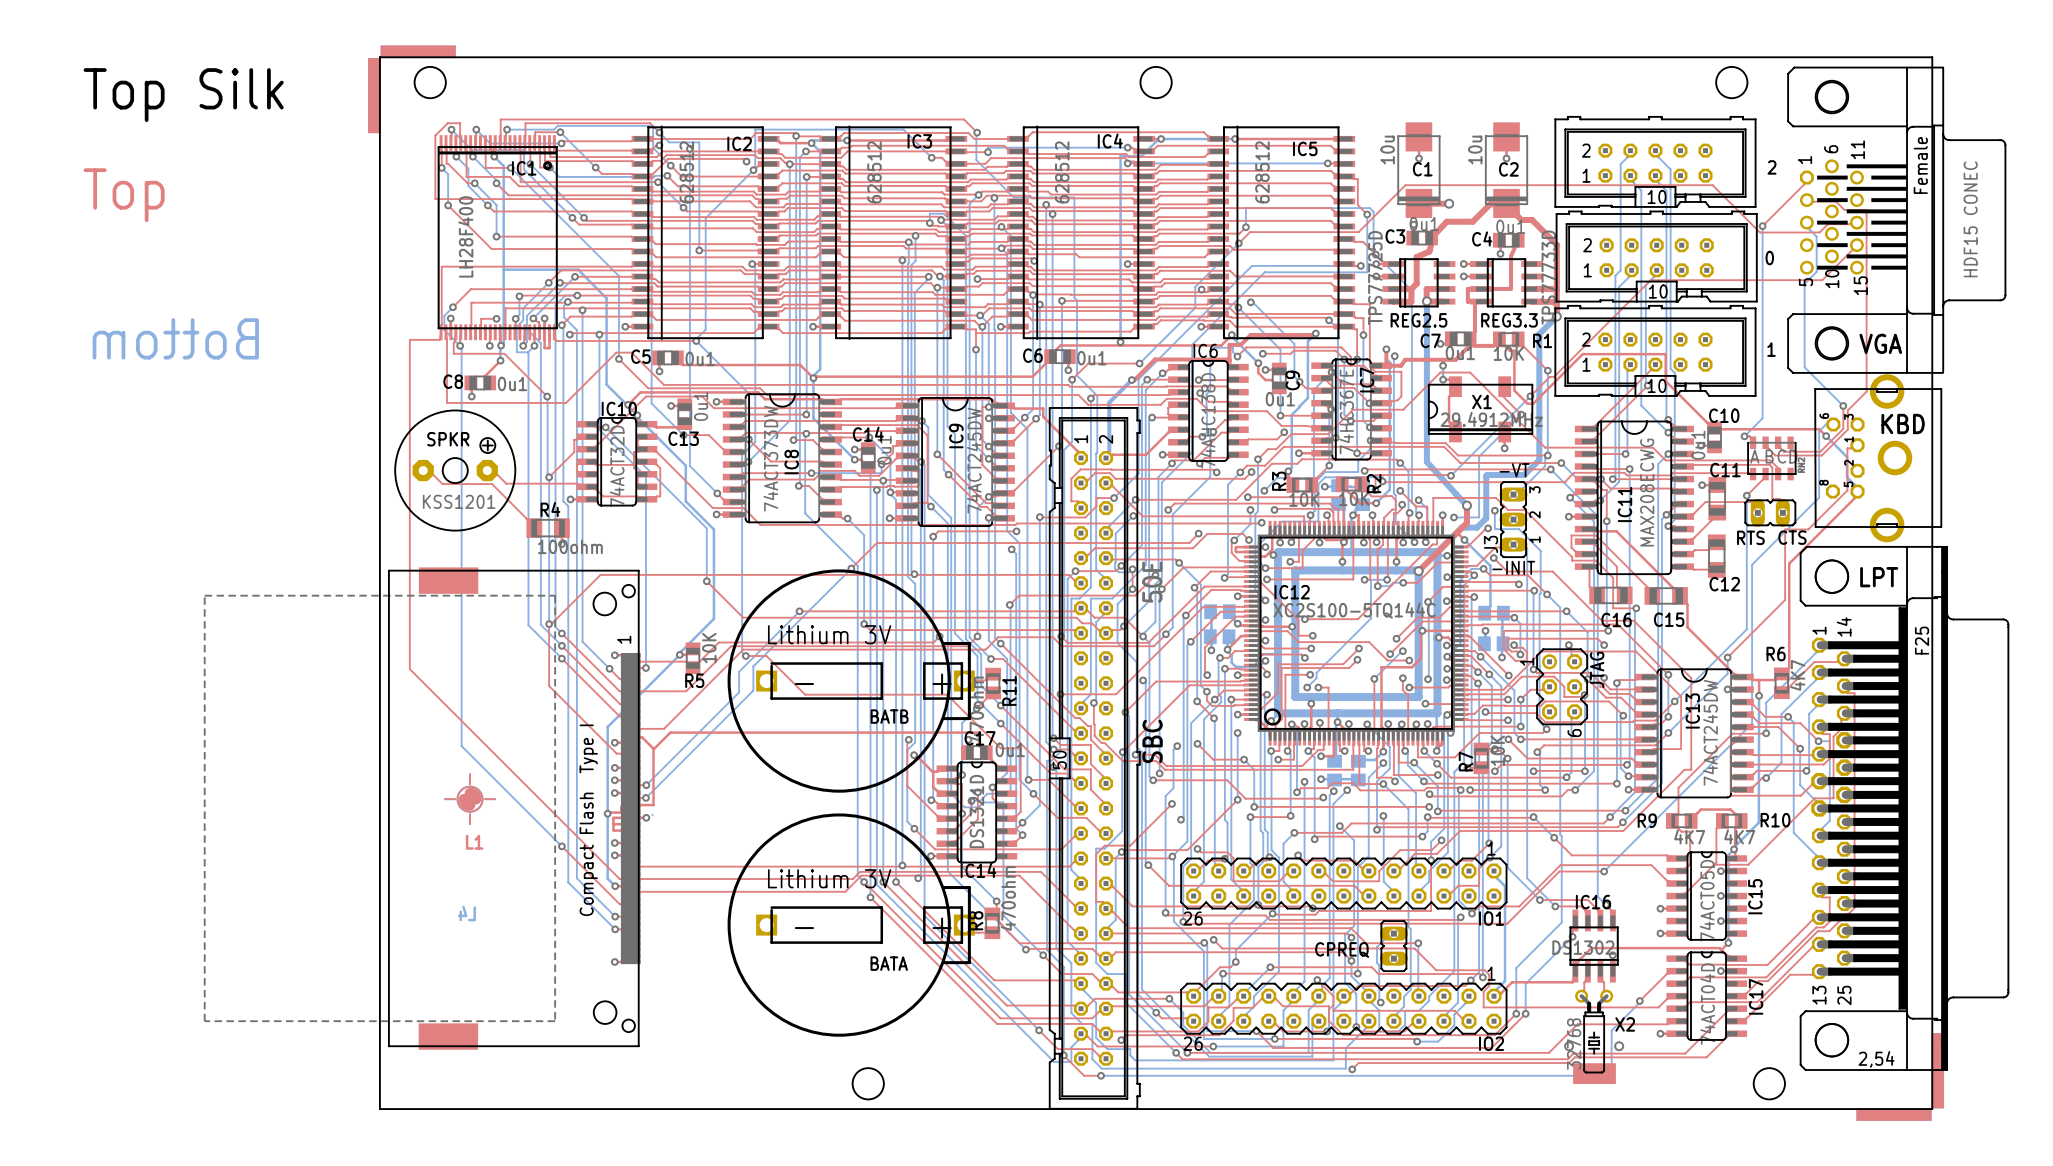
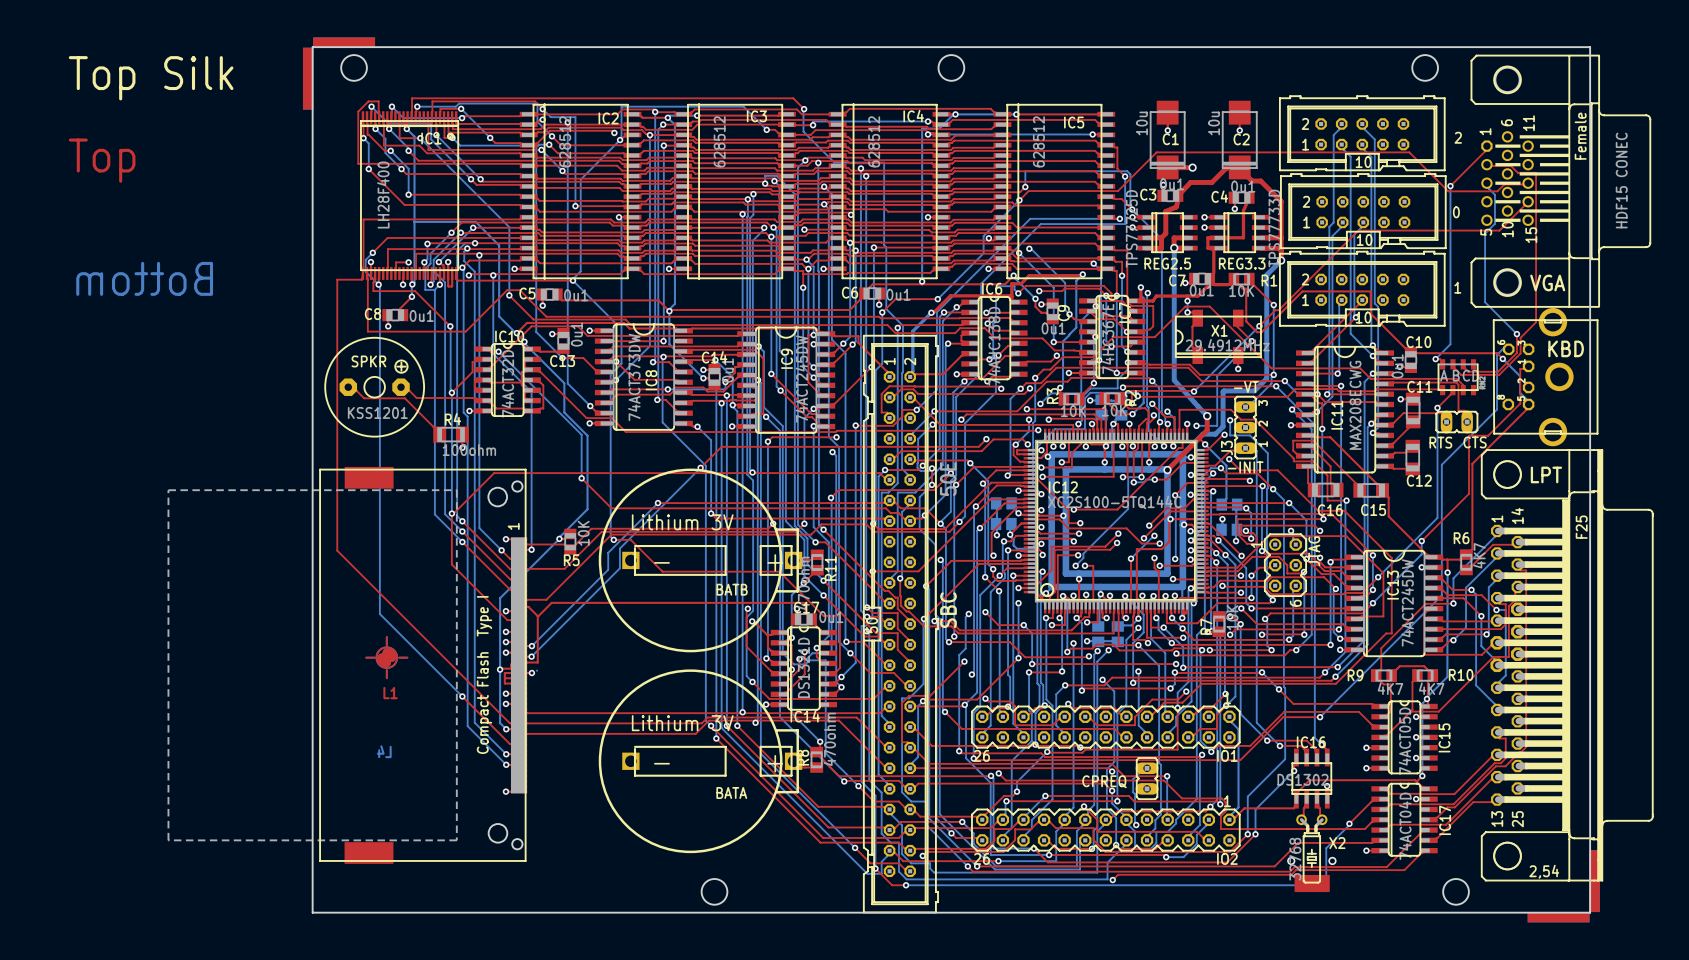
IC7 footprint: [1311, 358, 1392, 461] -> [1079, 295, 1146, 379]

